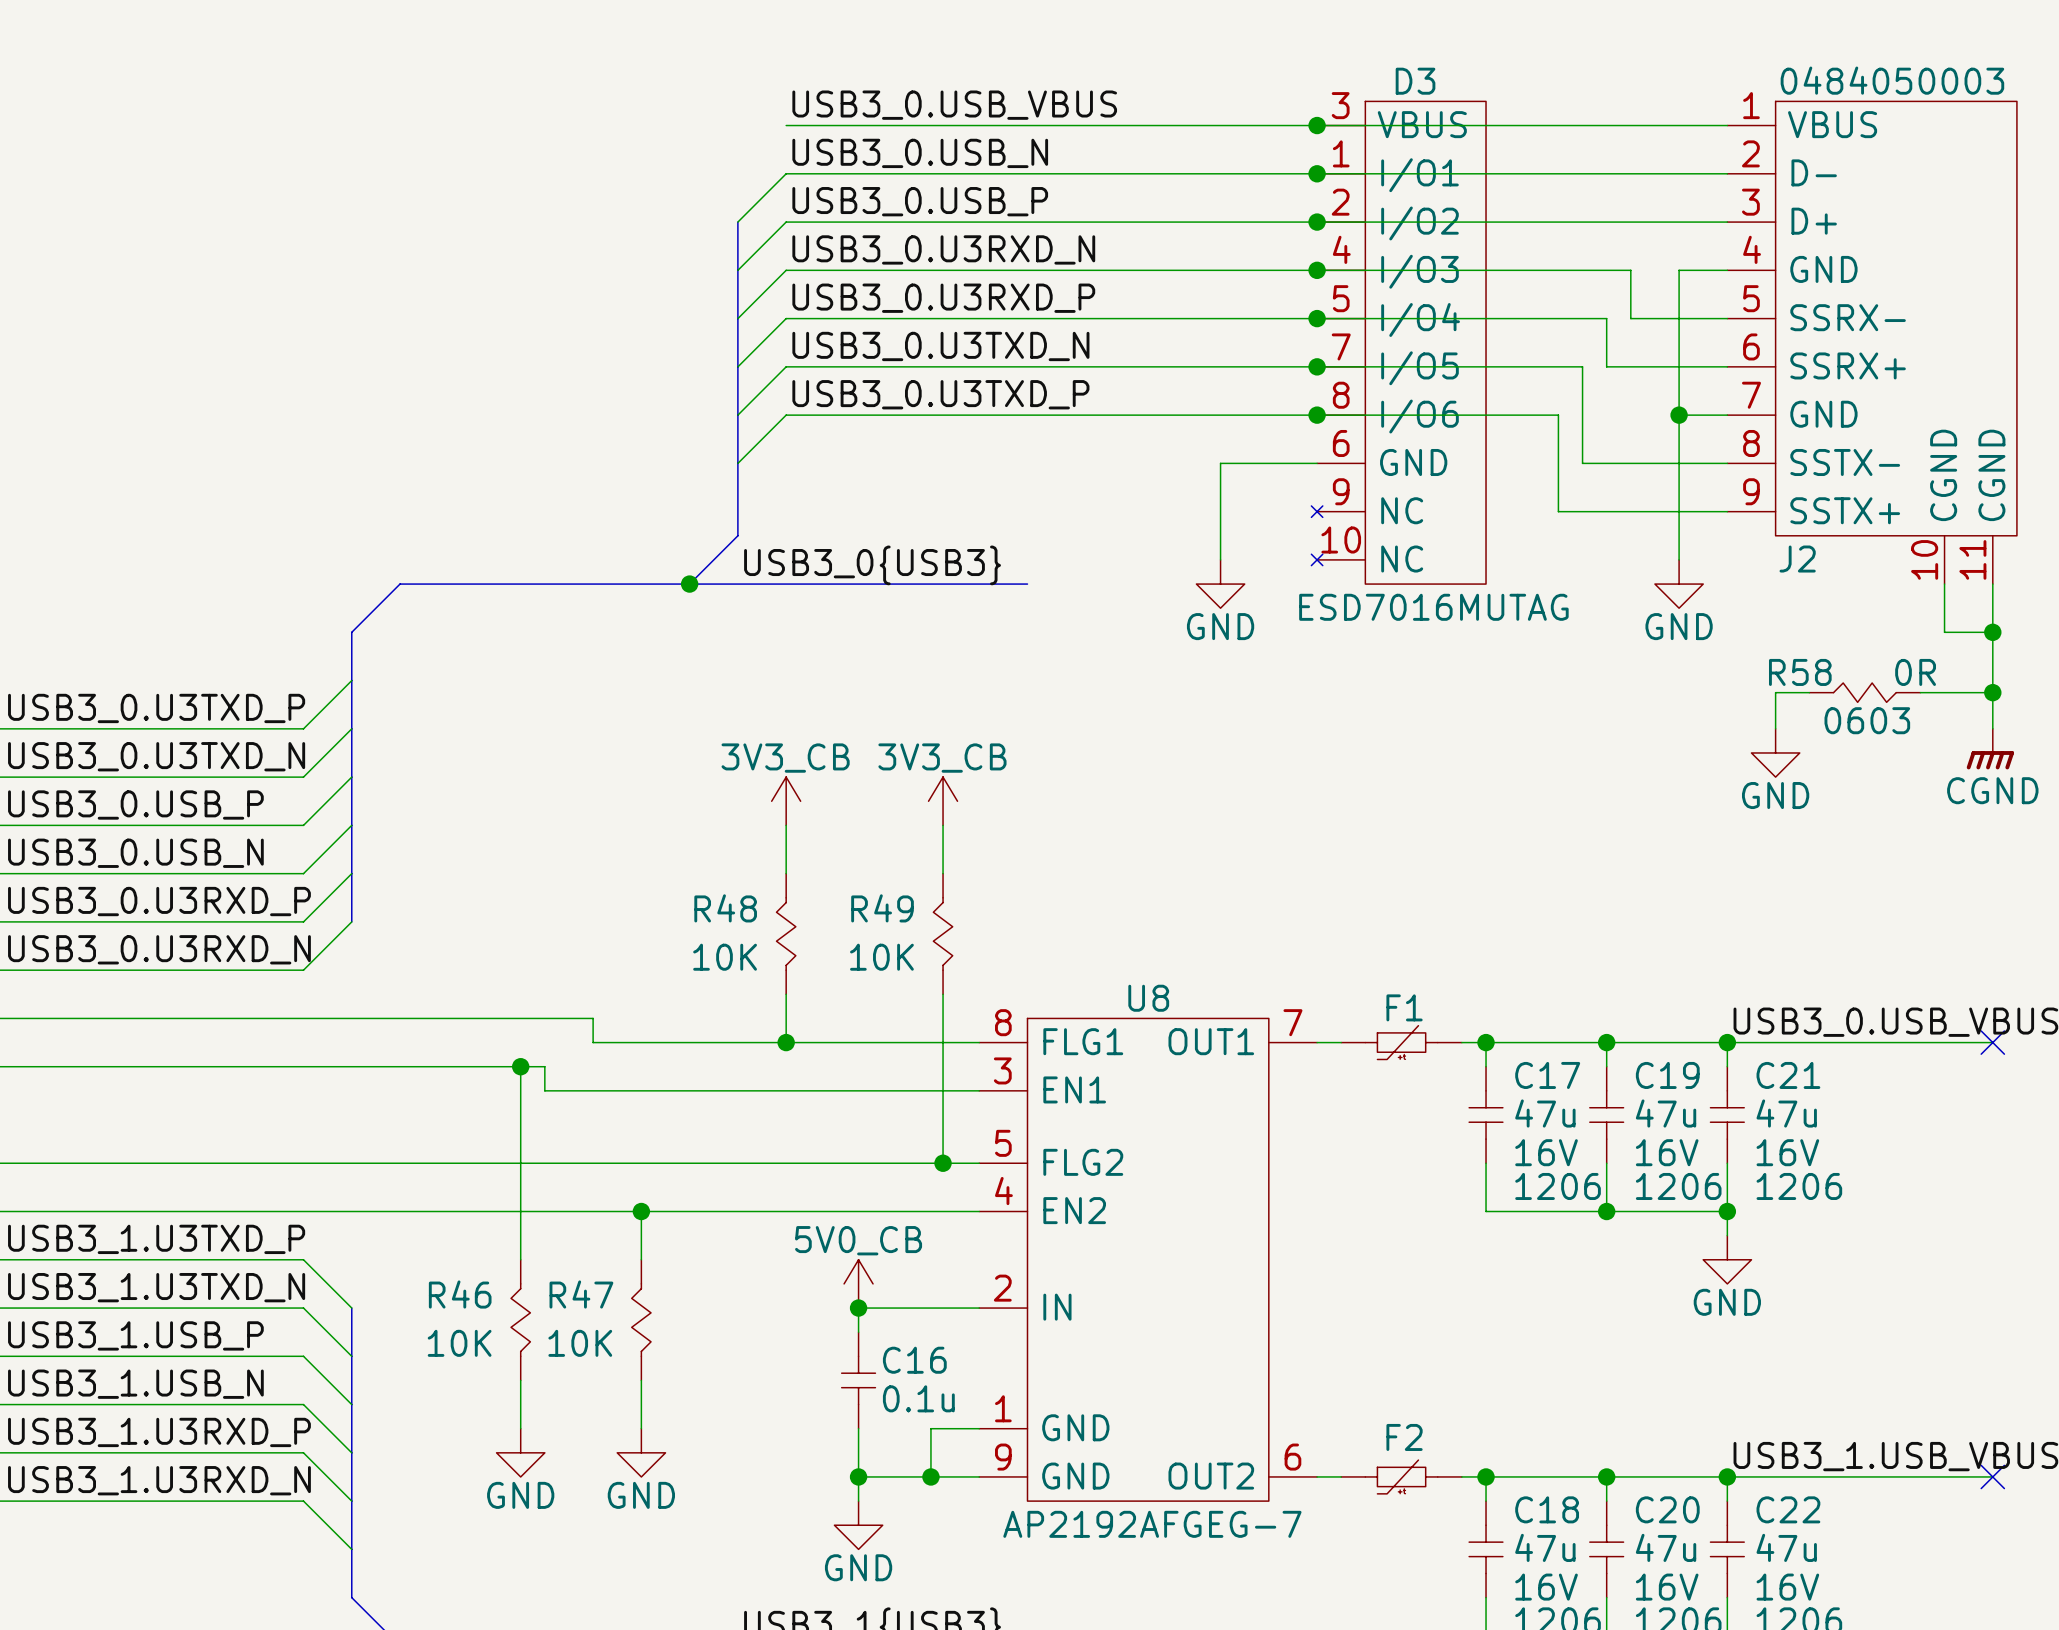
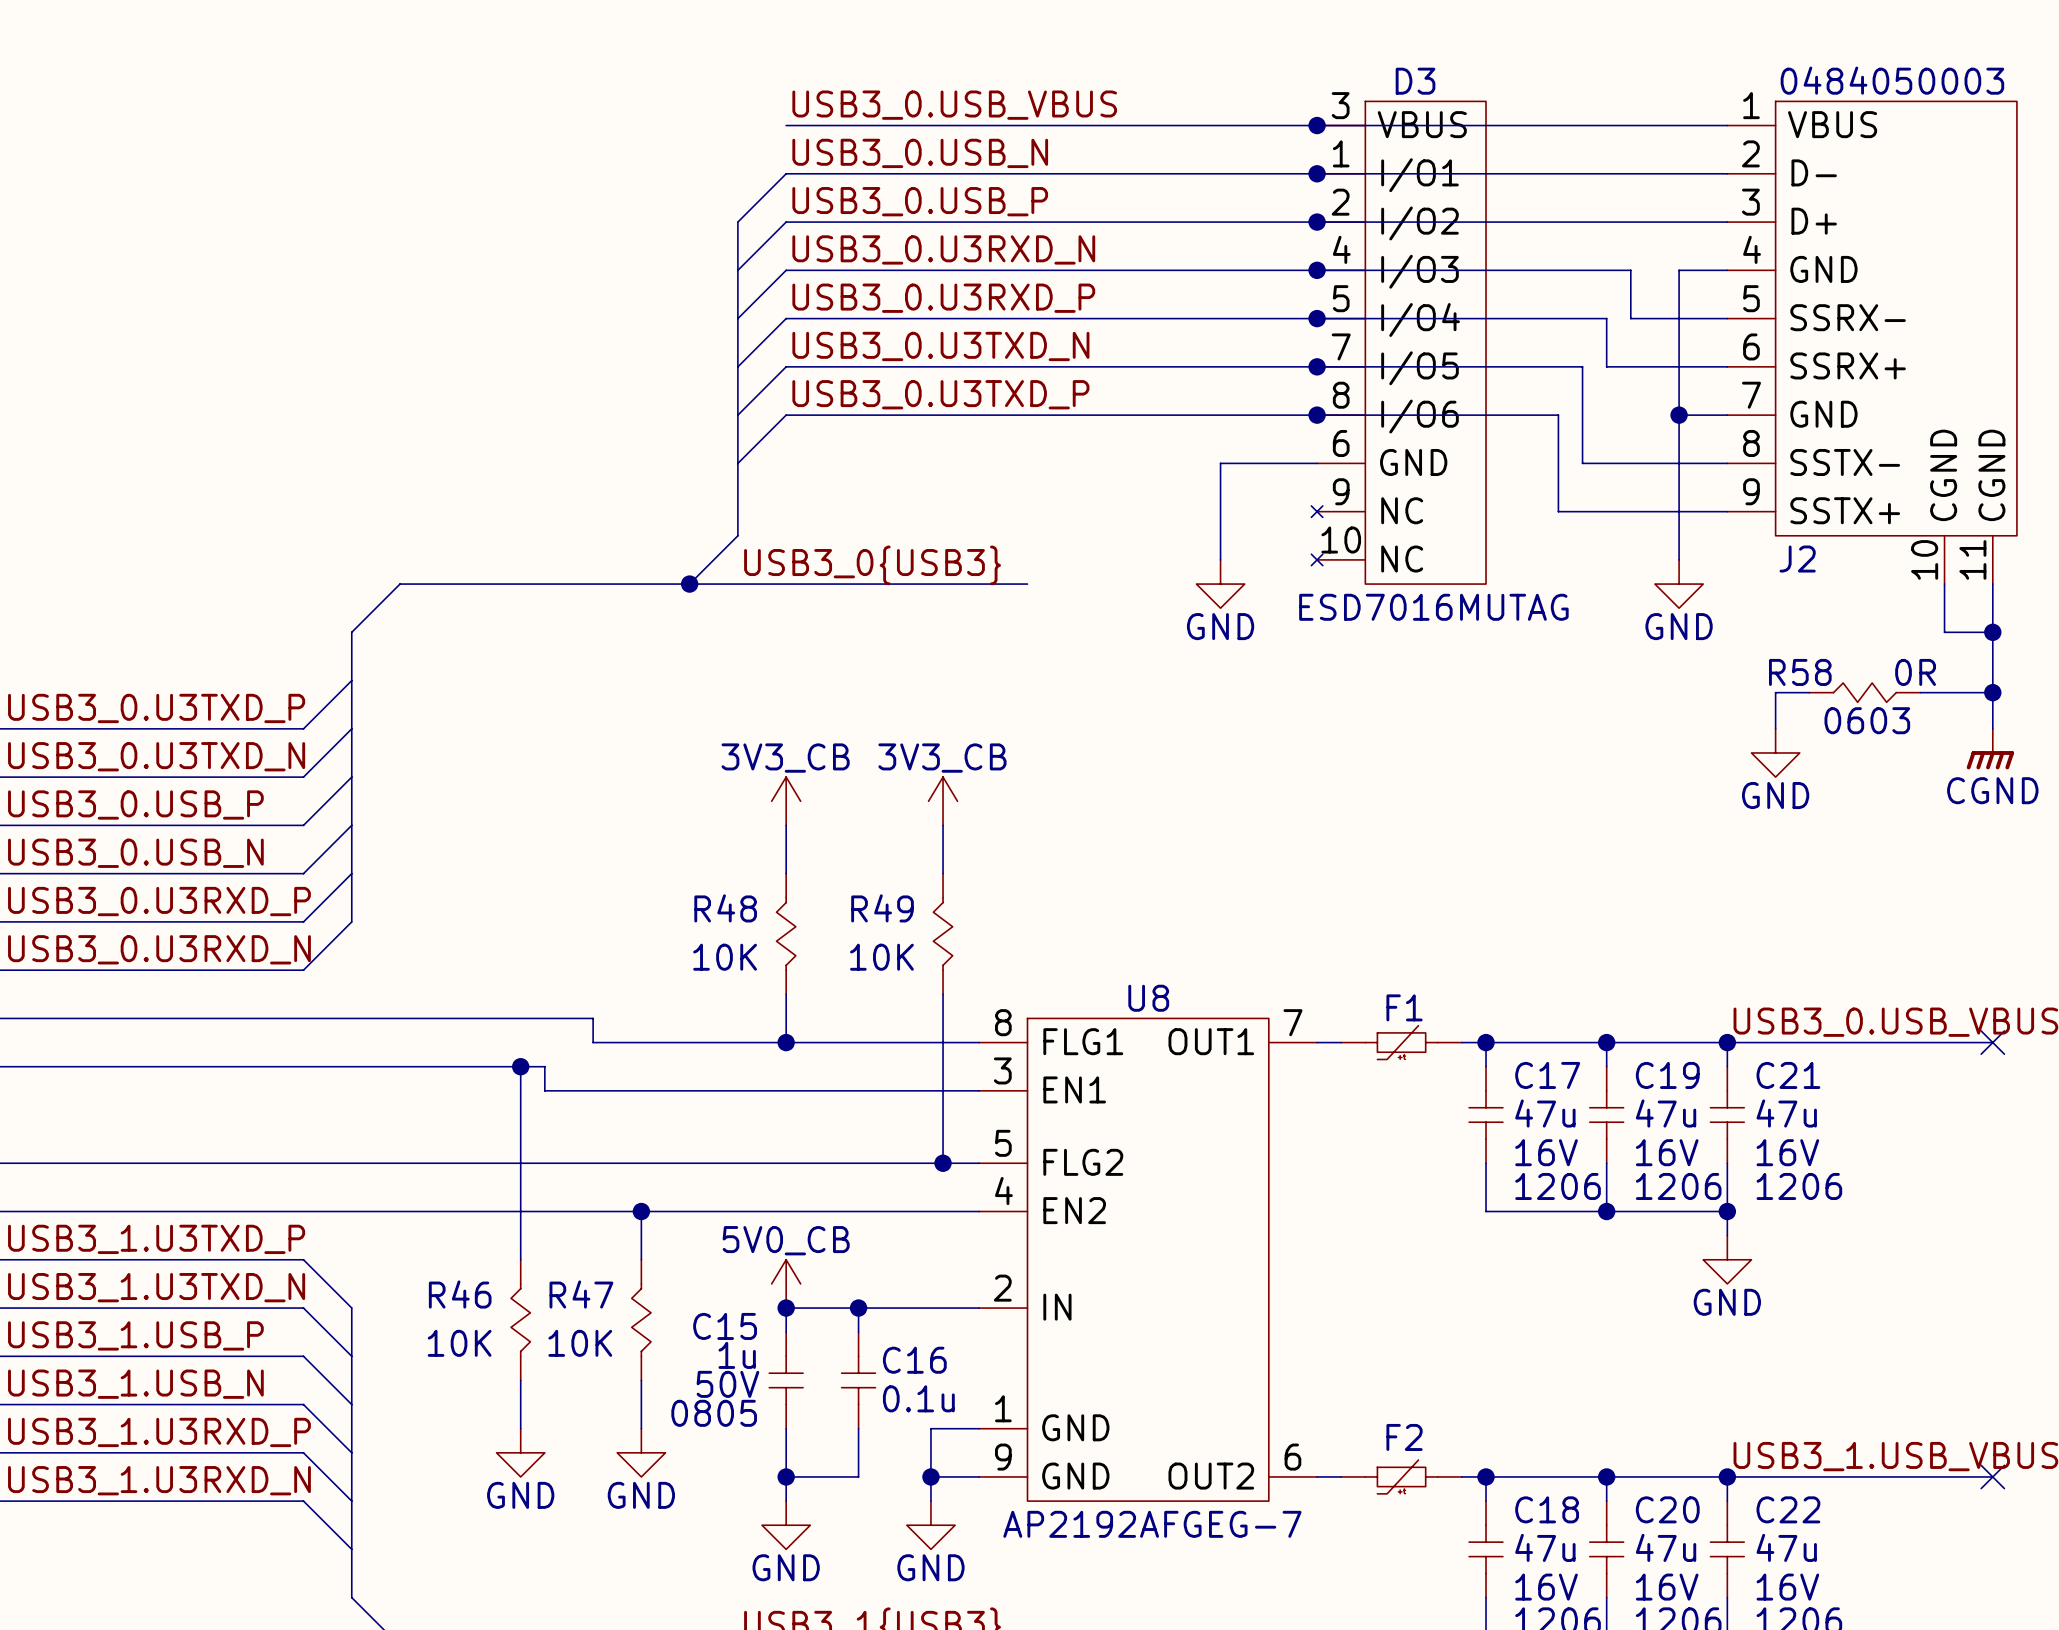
power symbol position: 5V0_CB (858, 1283) -> 5V0_CB (786, 1283)
junction: none -> (786, 1308)
wire: none -> (858, 1308) (786, 1308) (786, 1332)
C15: none -> 1u (786, 1380)
wire: none -> (786, 1428) (786, 1501)
wire: none -> (786, 1476) (858, 1476)
junction position: (858, 1476) -> (786, 1476)
wire: (930, 1476) (858, 1476) (858, 1501) -> (930, 1476) (930, 1501)
power symbol: none -> GND (786, 1525)
power symbol: GND (858, 1525) -> none
power symbol: none -> GND (930, 1525)

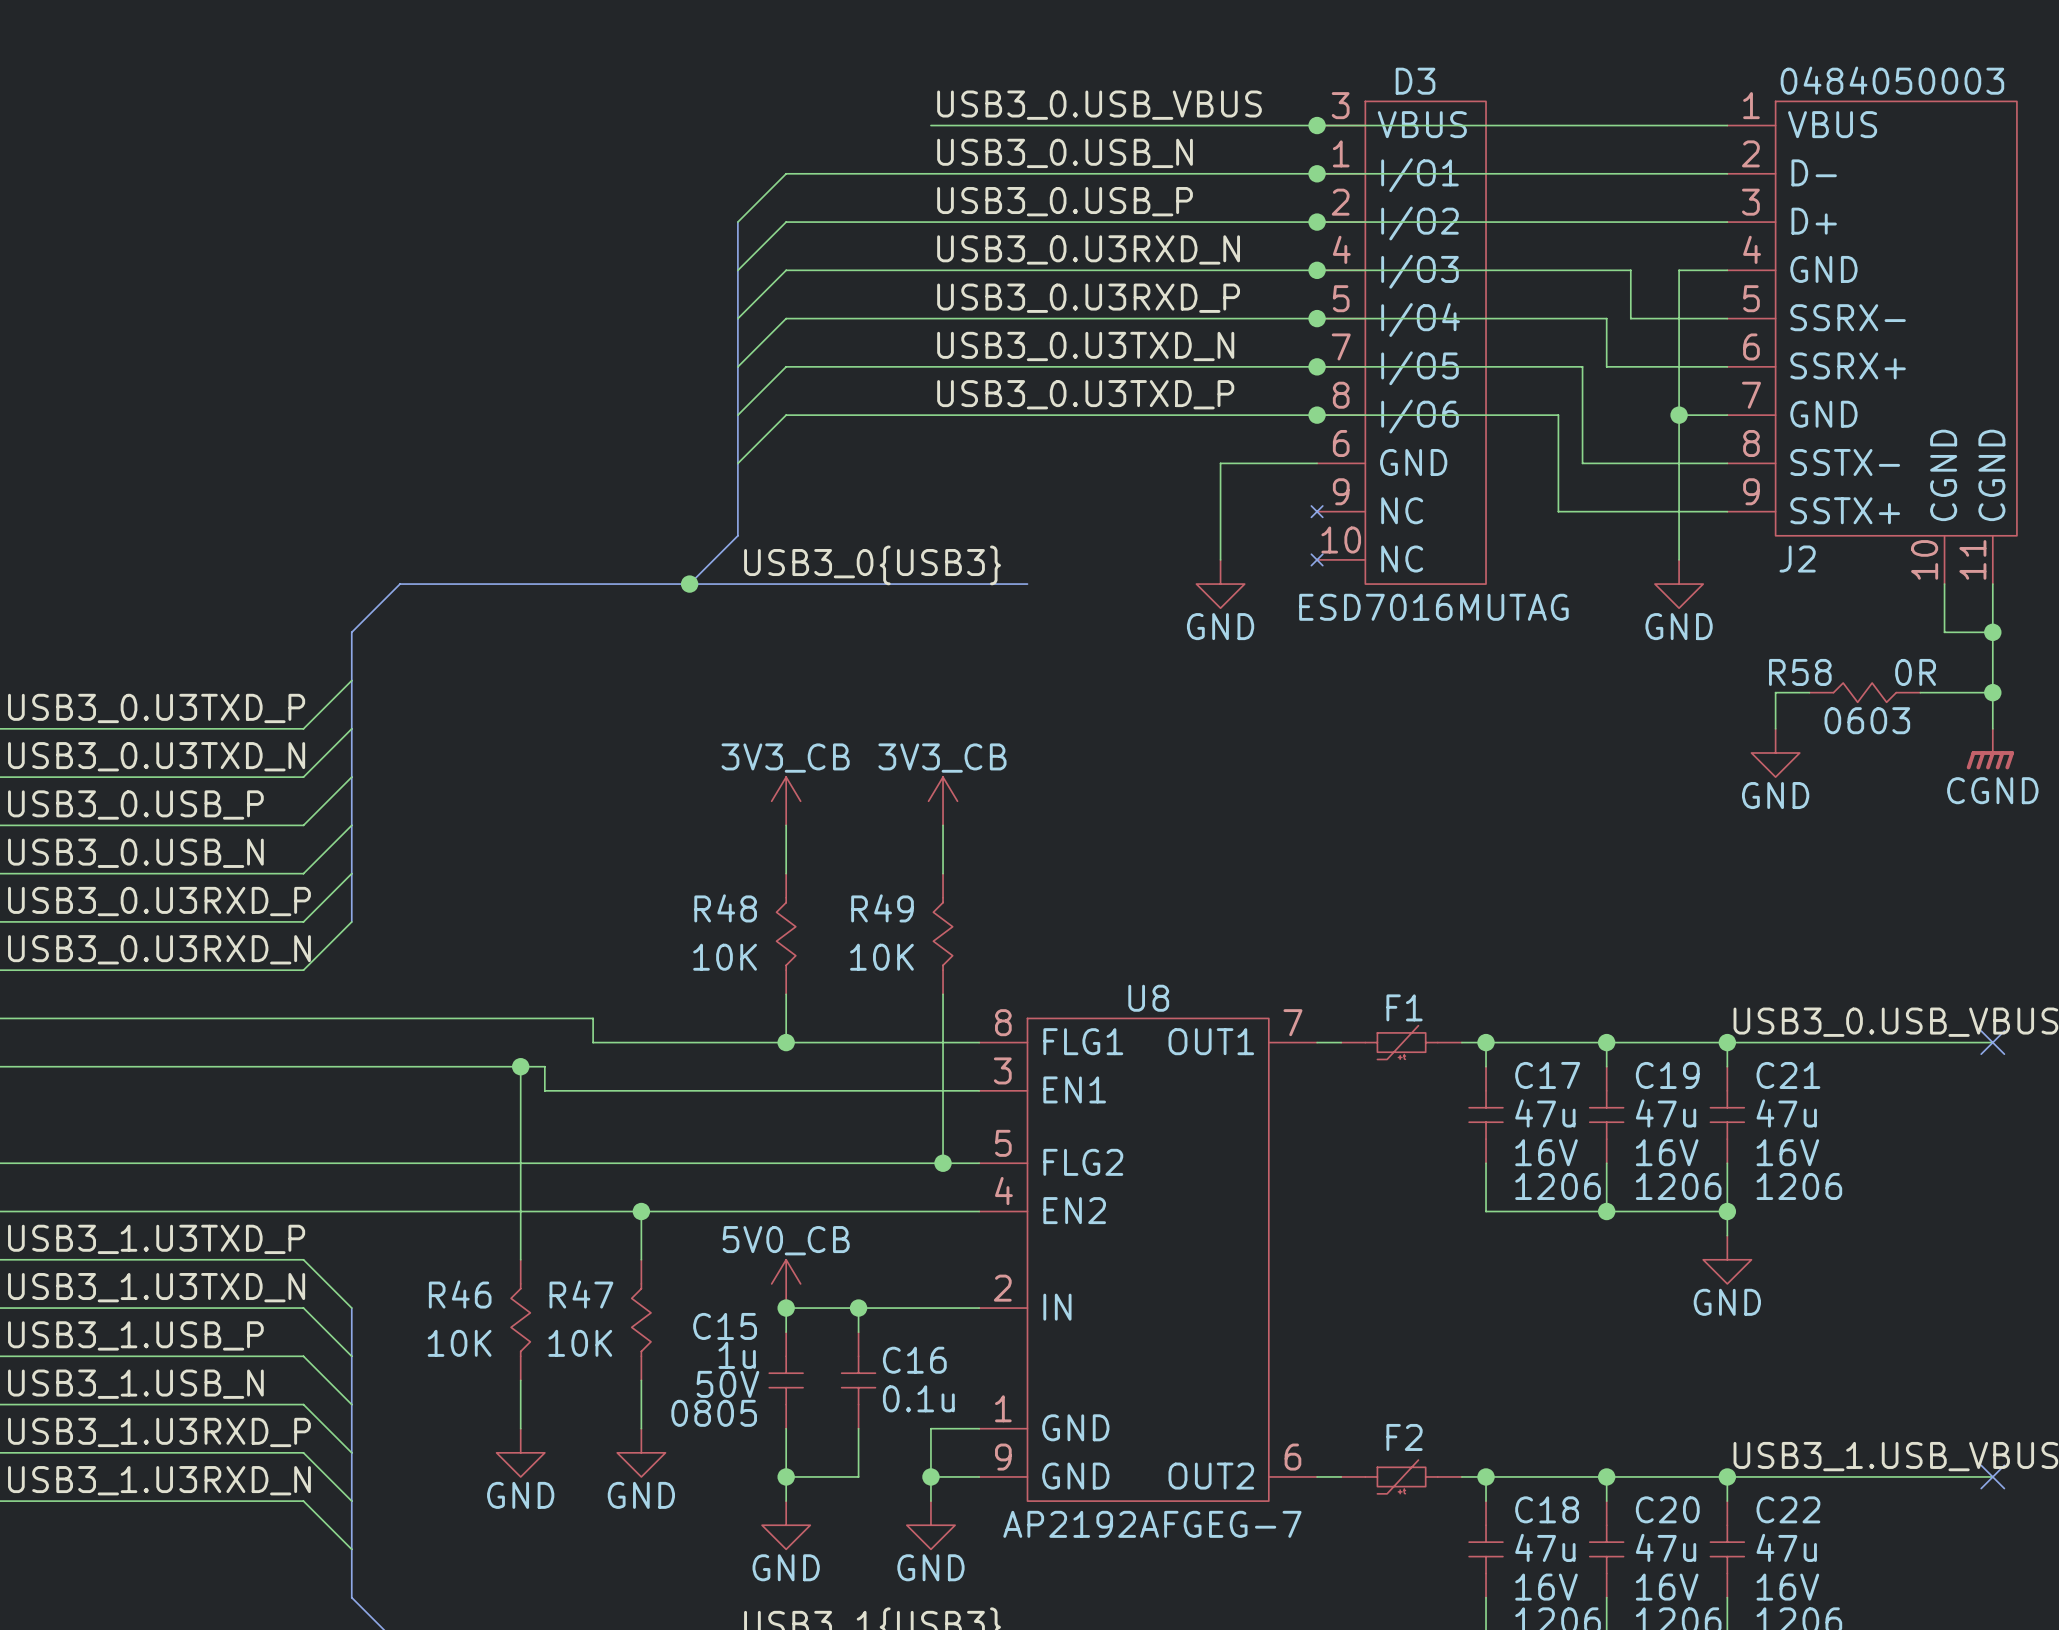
label position: USB3_0.USB_VBUS (954, 105) -> USB3_0.USB_VBUS (1099, 105)
wire: (786, 125) (930, 125) -> none
label position: USB3_0.USB_N (920, 153) -> USB3_0.USB_N (1065, 153)
label position: USB3_0.USB_P (920, 201) -> USB3_0.USB_P (1065, 201)
label position: USB3_0.U3RXD_N (943, 249) -> USB3_0.U3RXD_N (1088, 249)
label position: USB3_0.U3RXD_P (943, 298) -> USB3_0.U3RXD_P (1088, 298)
label position: USB3_0.U3TXD_N (940, 346) -> USB3_0.U3TXD_N (1085, 346)
label position: USB3_0.U3TXD_P (940, 394) -> USB3_0.U3TXD_P (1085, 394)

